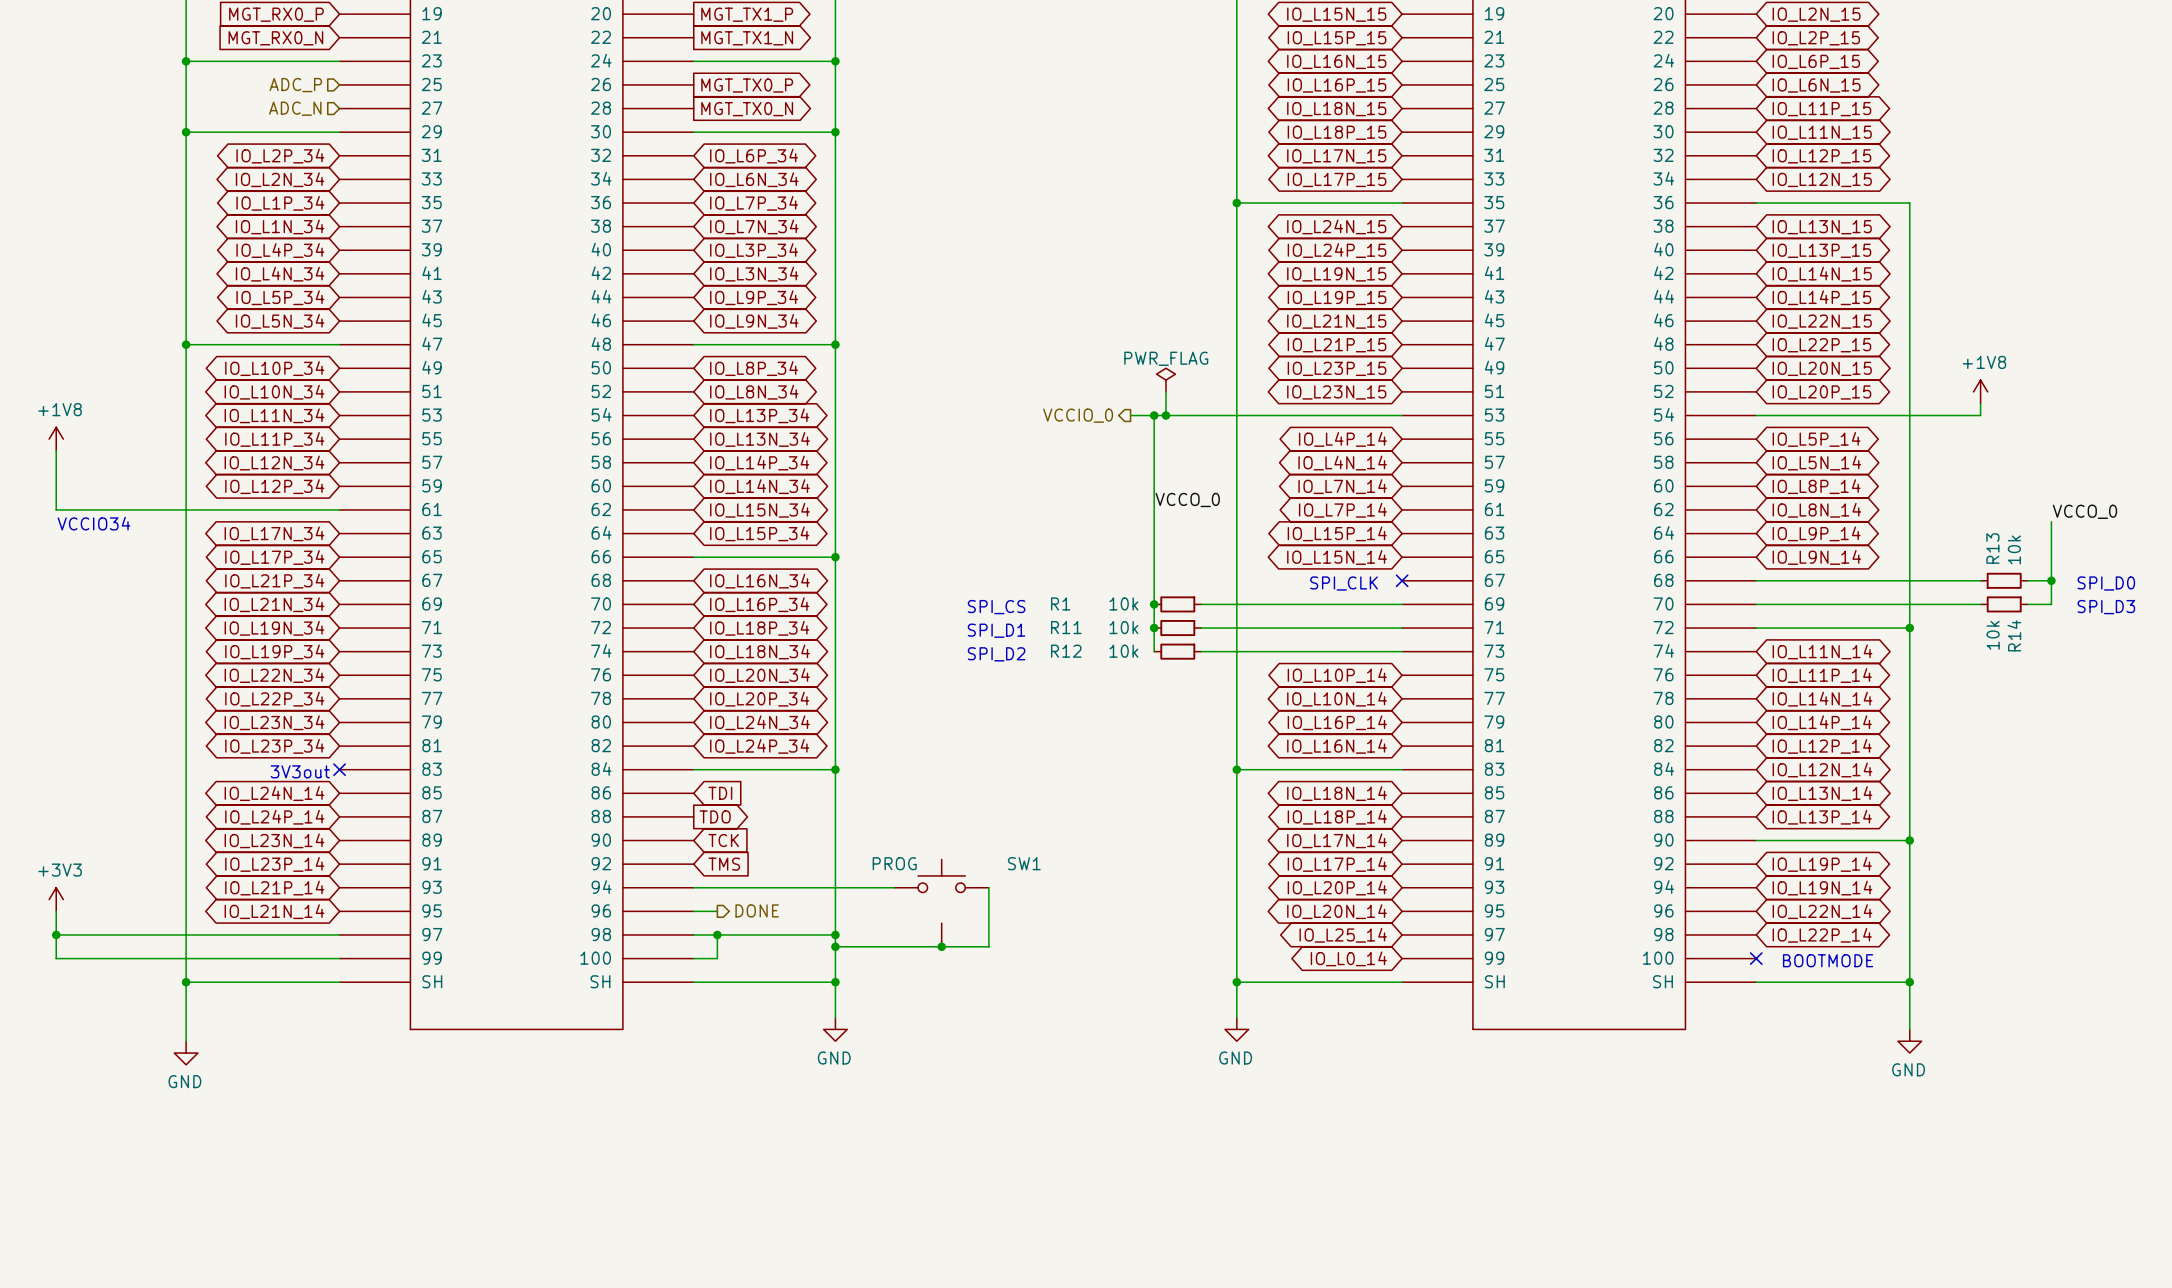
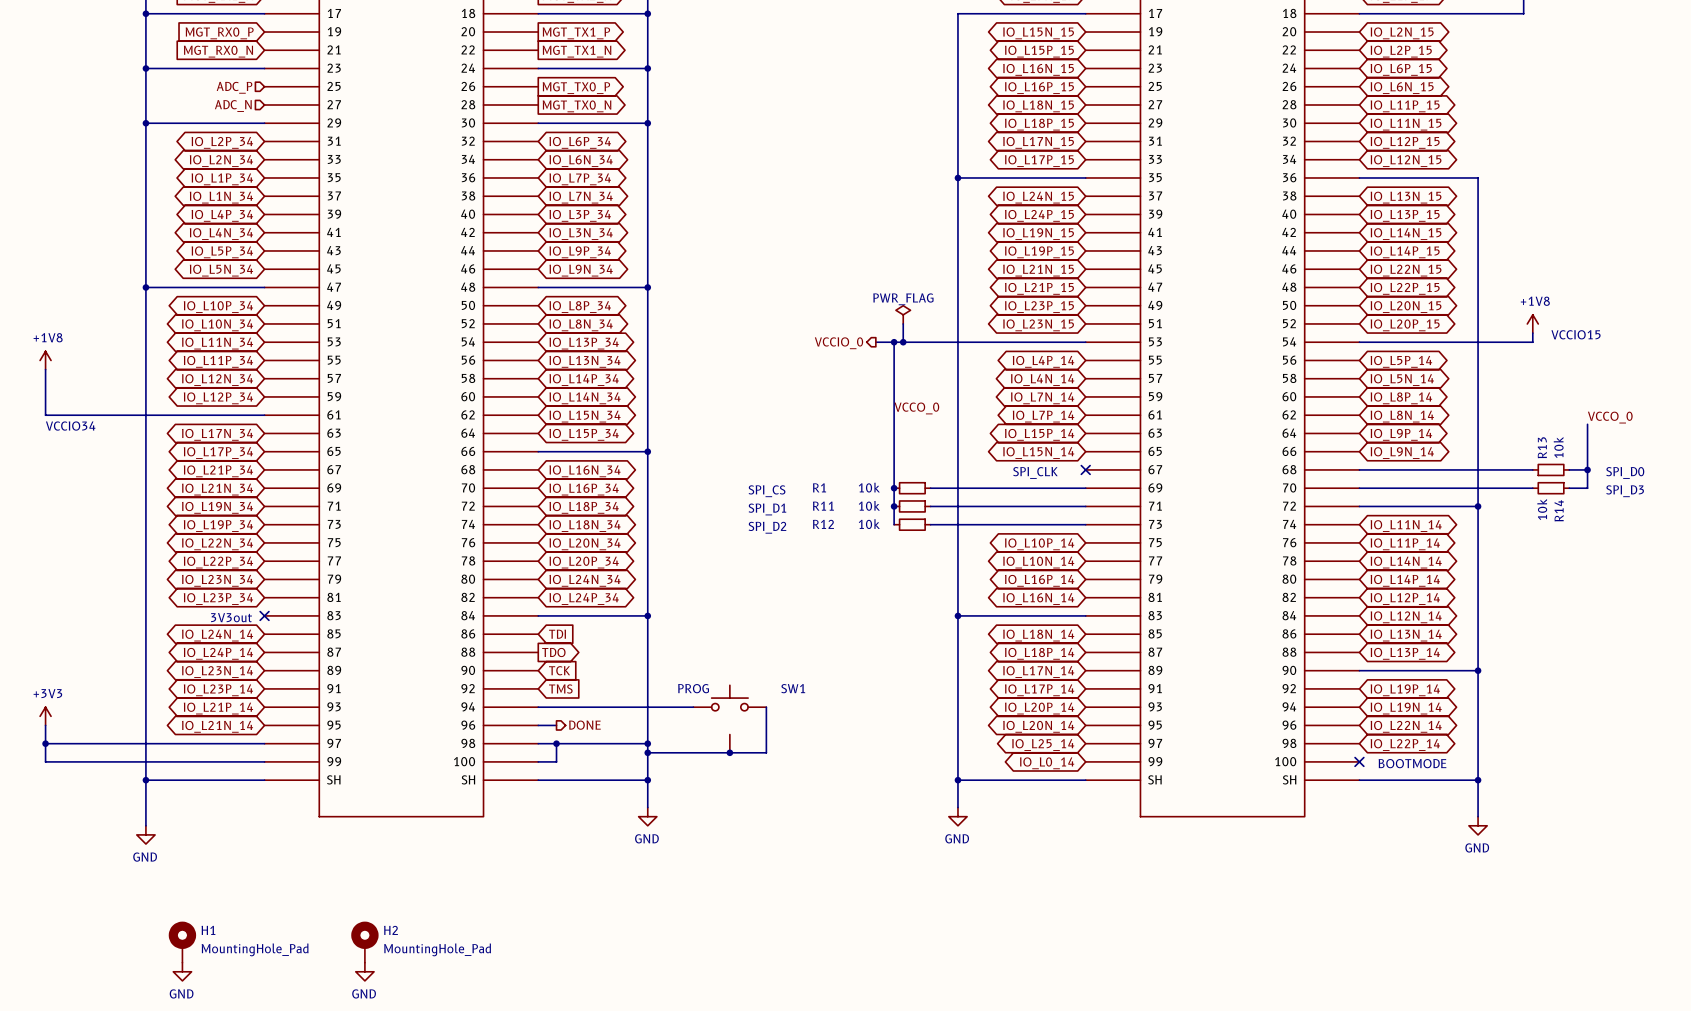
text: none -> VCCIO15 (1576, 334)
H1: none -> MountingHole_Pad (182, 942)
H2: none -> MountingHole_Pad (364, 942)
power symbol: none -> GND (182, 971)
power symbol: none -> GND (364, 971)

